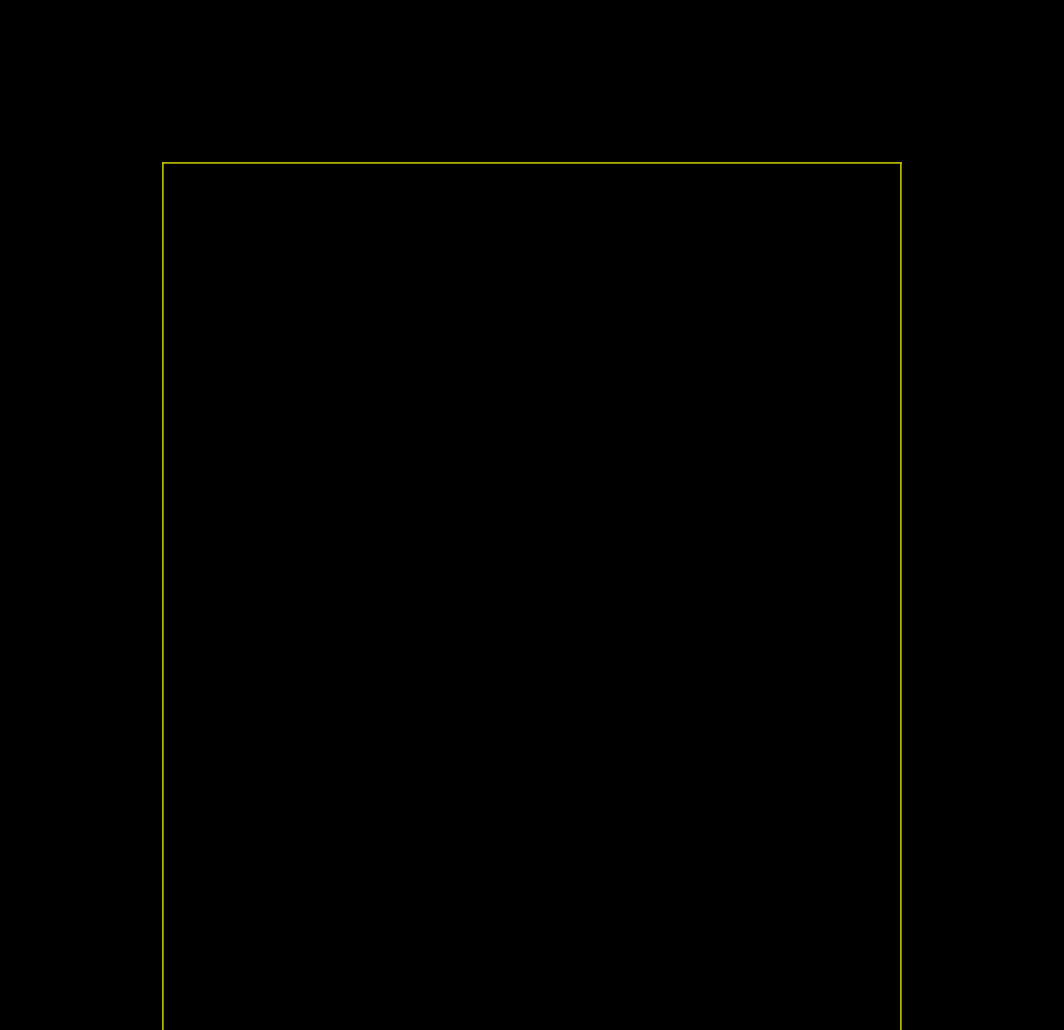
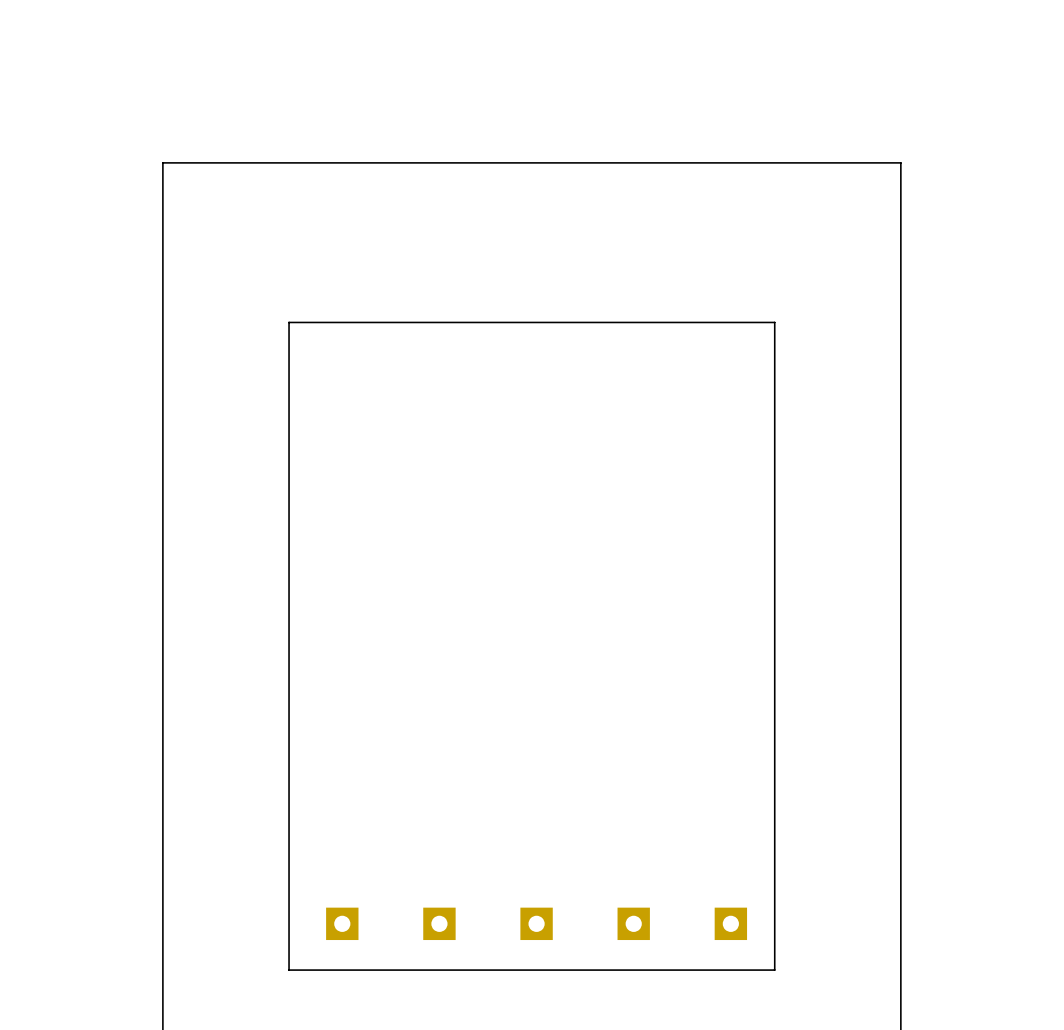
board edge: none -> (774, 322) (289, 322) (289, 970) (774, 970) (774, 322)
part: none -> (342, 923)
part: none -> (439, 923)
part: none -> (536, 923)
part: none -> (633, 923)
part: none -> (730, 923)

